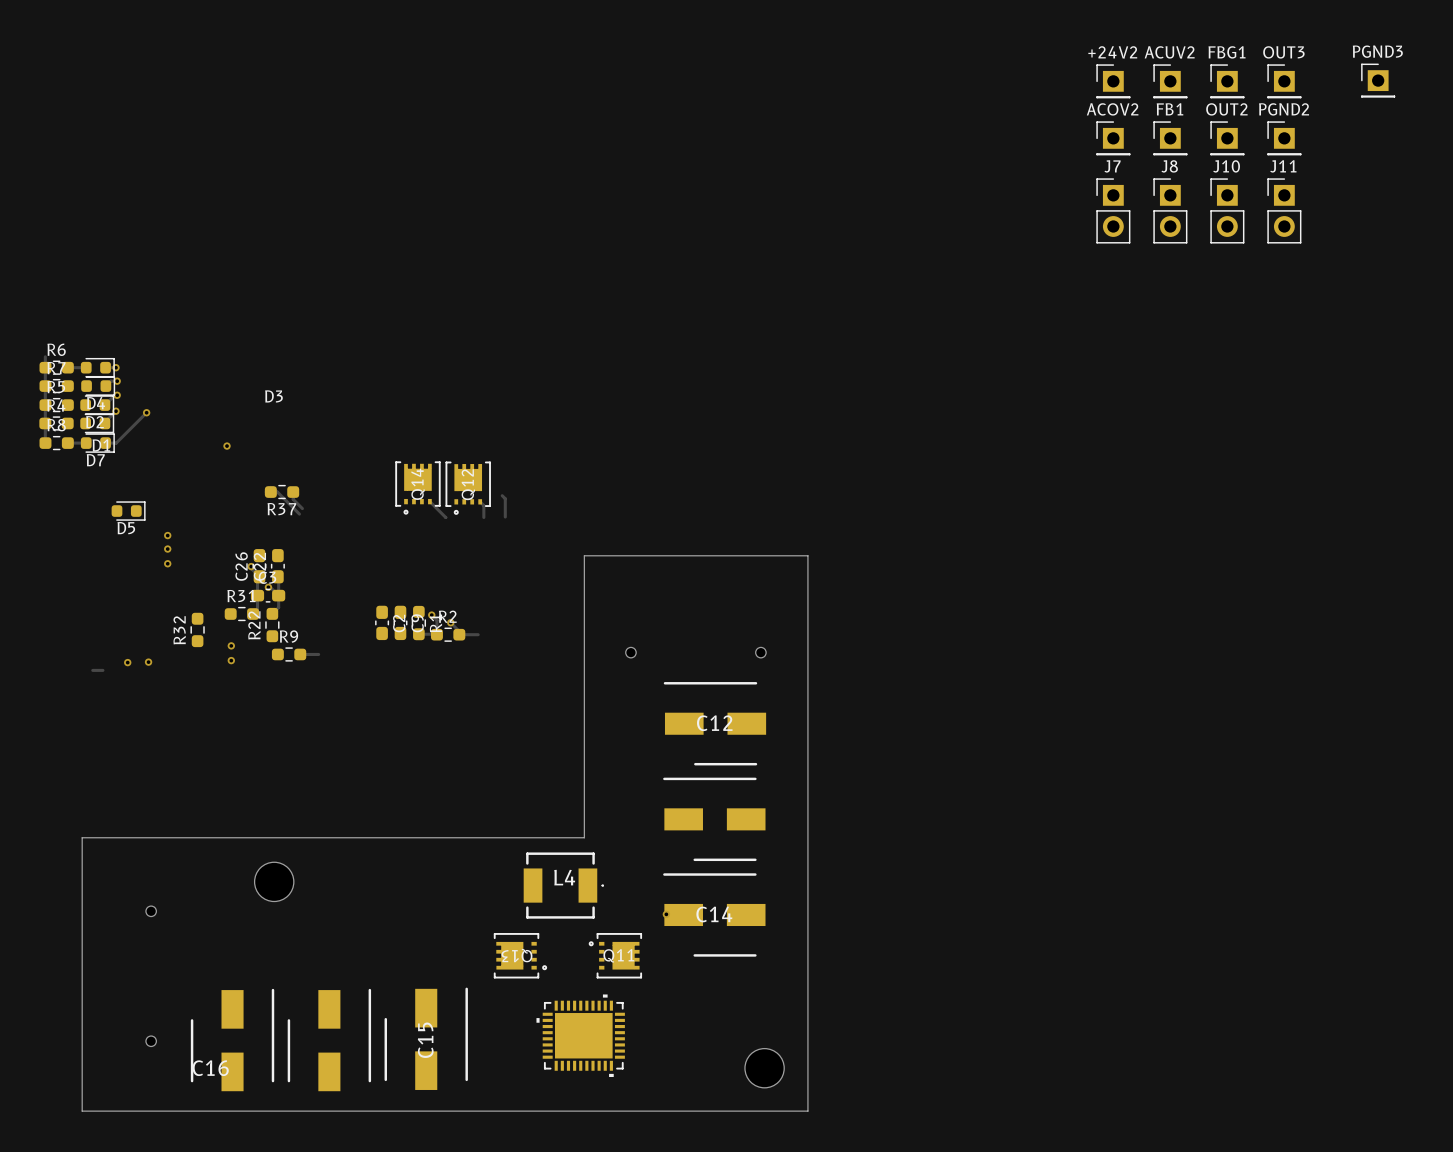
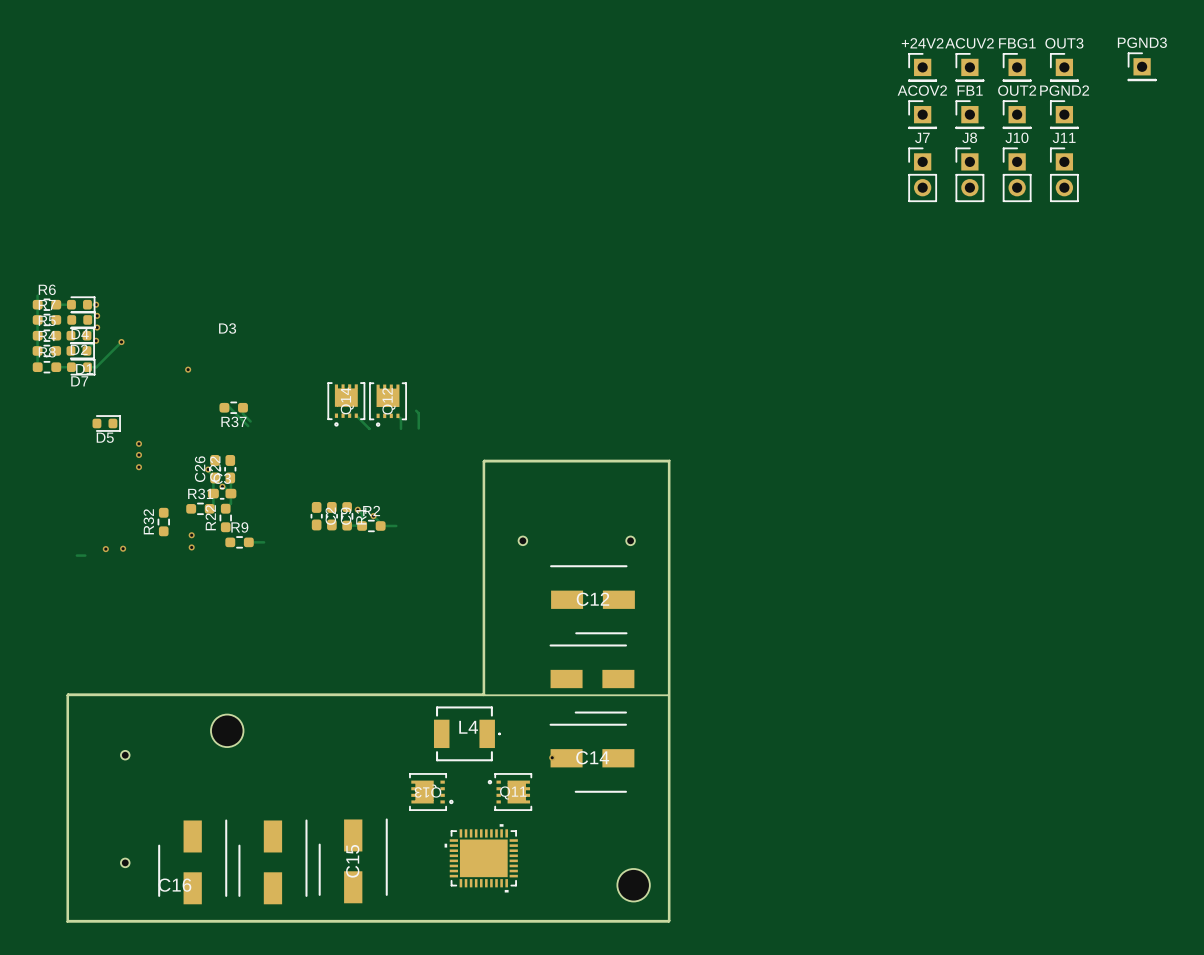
board edge: none -> (483, 695) (483, 461) (668, 461) (668, 921) (67, 921) (67, 695) (668, 695)

